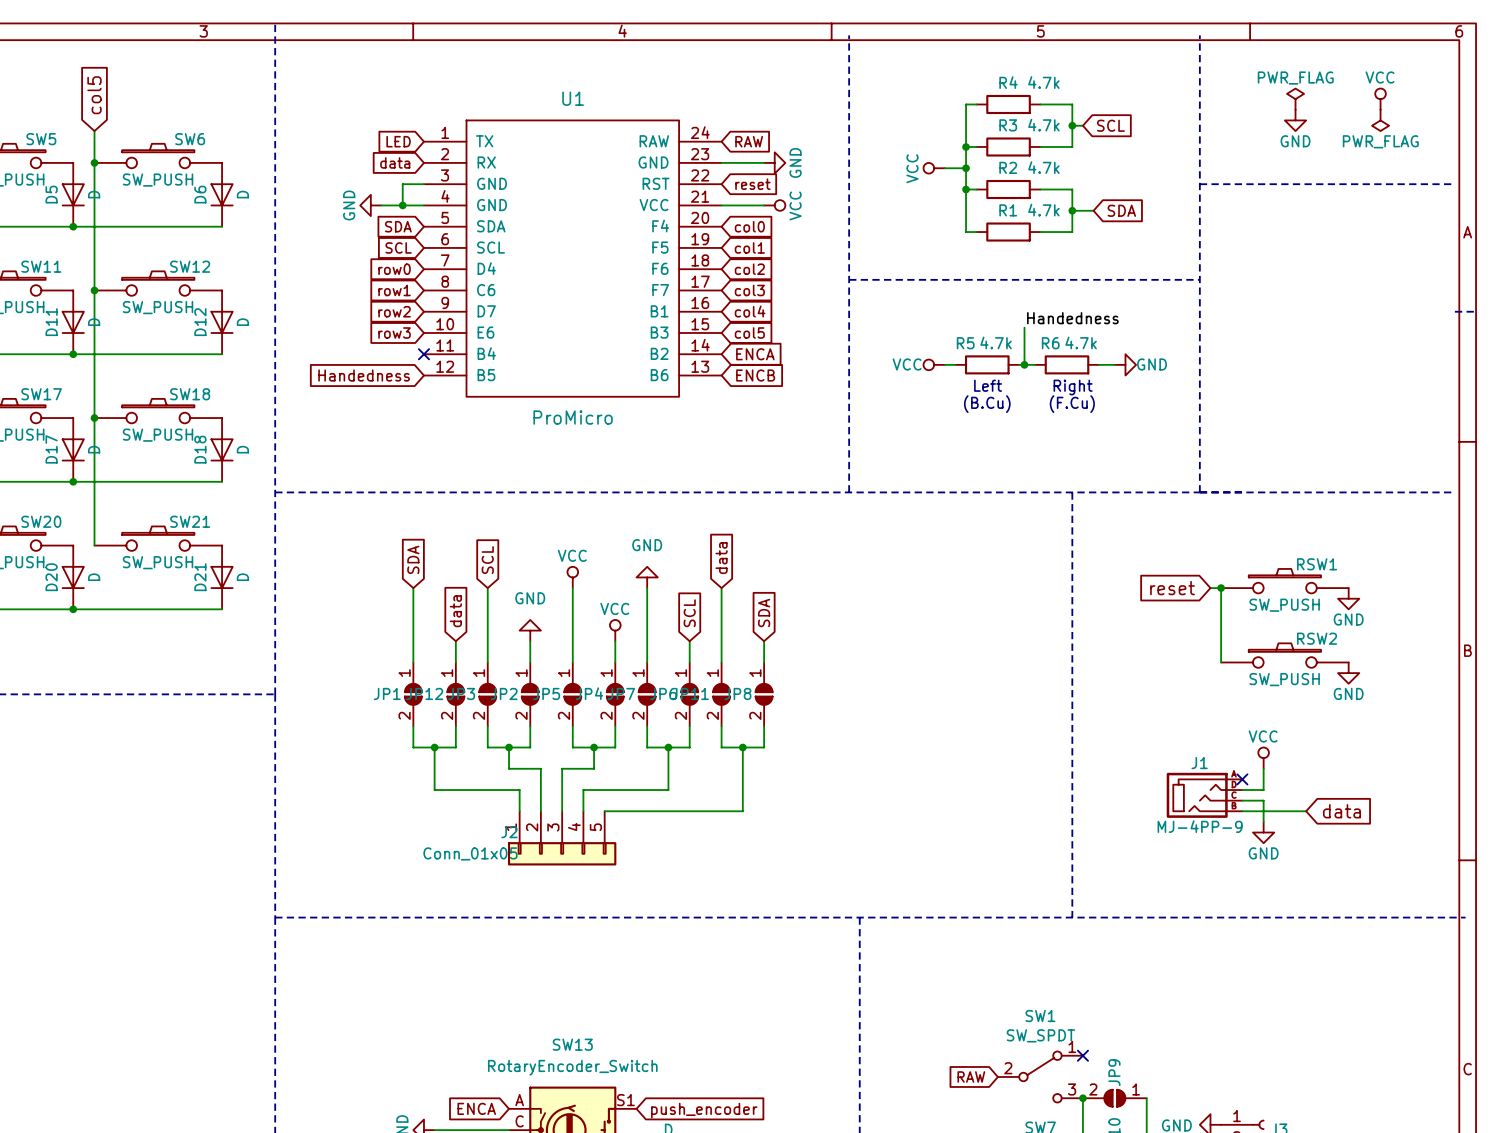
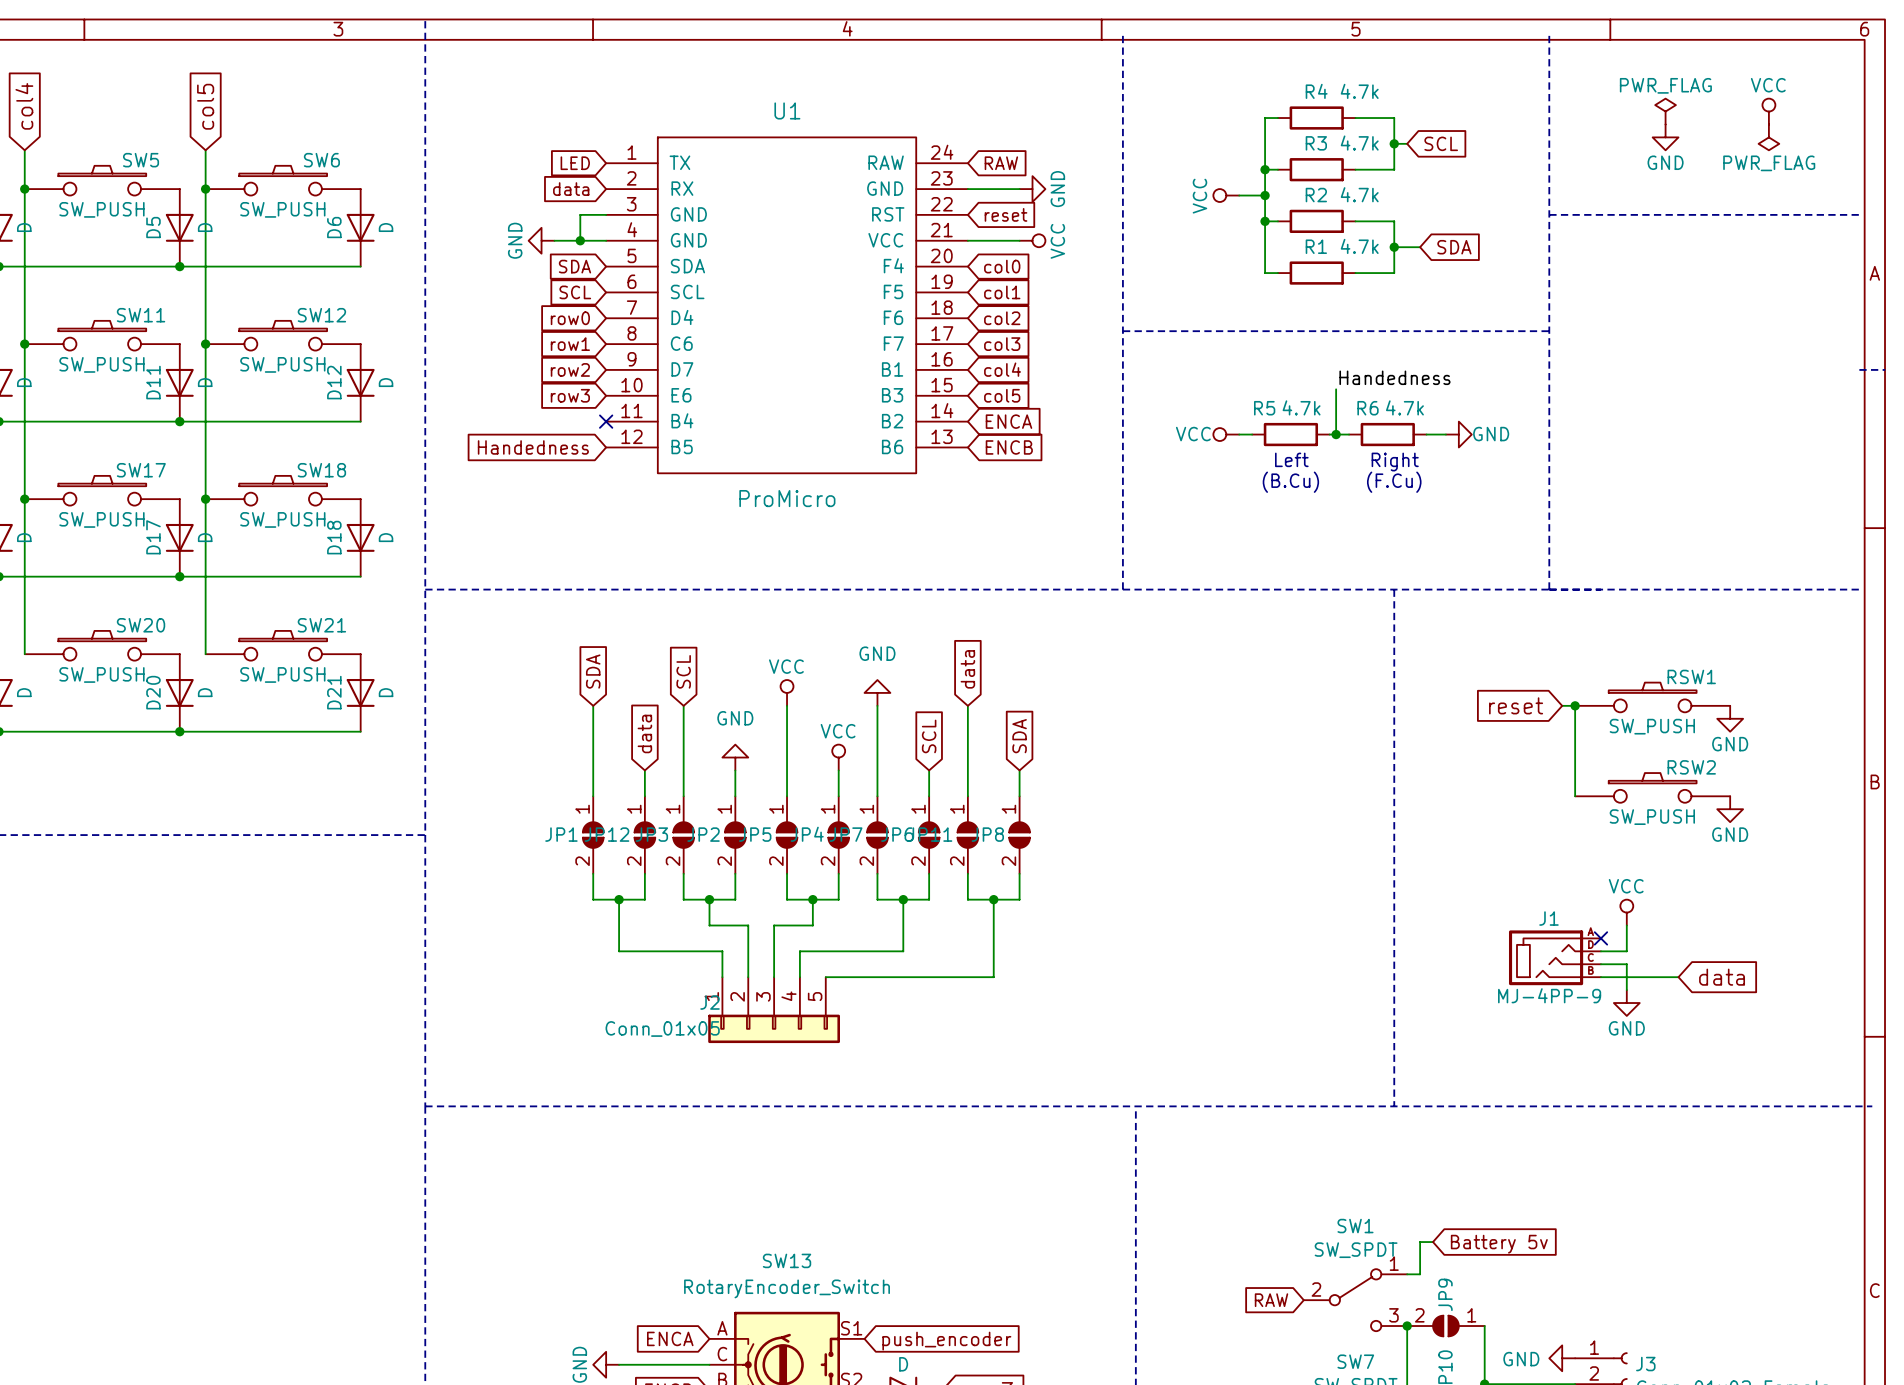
wire: none -> (1433, 1242) (1420, 1242) (1420, 1274) (1407, 1274)
global label: none -> Battery 5v (1499, 1244)
no-connect mark: (1082, 1055) -> none

